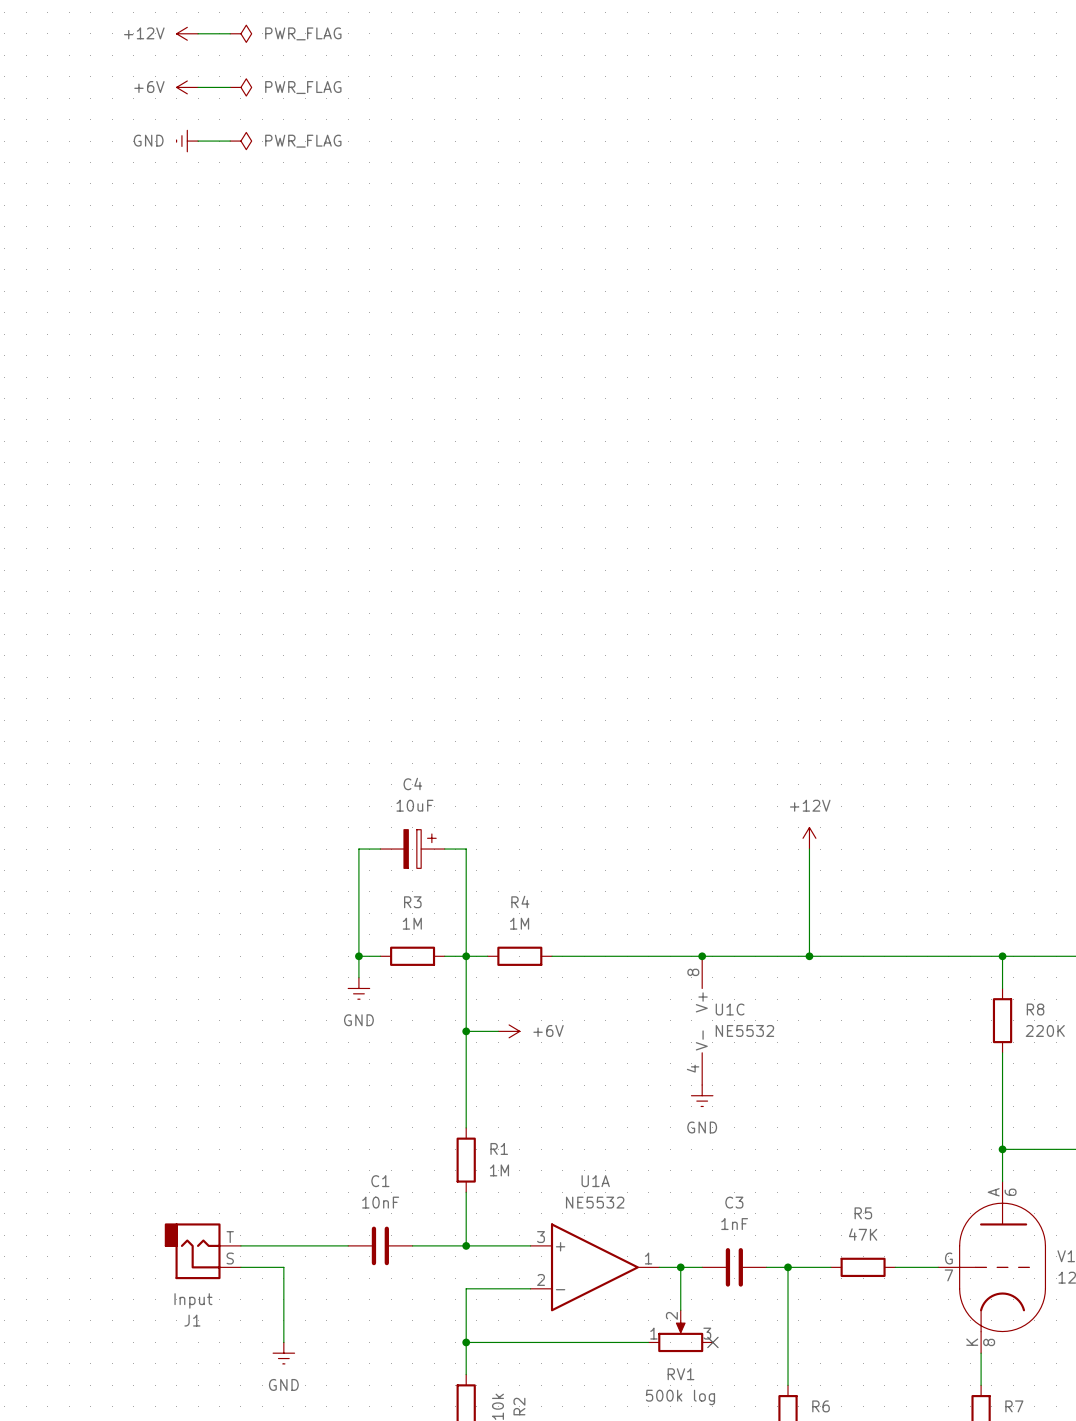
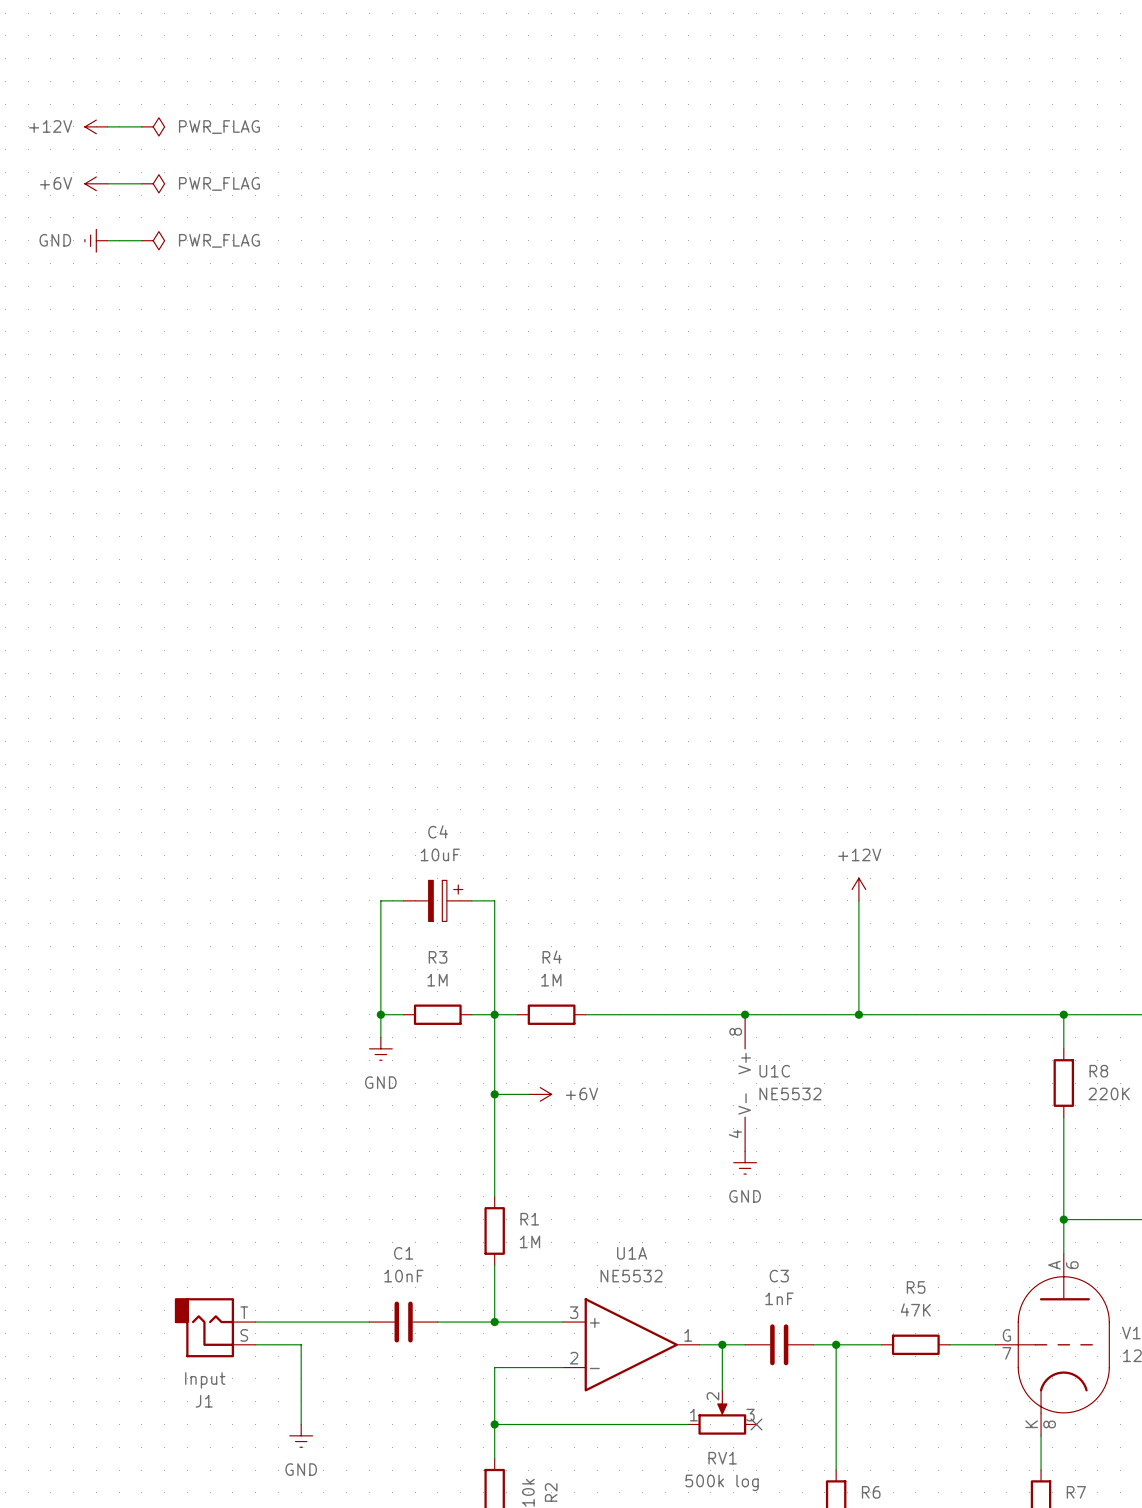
power symbol position: +12V (187, 33) -> +12V (96, 126)
wire: (198, 33) (230, 33) -> (107, 126) (141, 126)
power symbol: PWR_FLAG (240, 33) -> none
power symbol position: +6V (187, 87) -> +6V (96, 183)
wire: (198, 87) (230, 87) -> (107, 183) (141, 183)
power symbol: PWR_FLAG (240, 87) -> none
power symbol: none -> PWR_FLAG (153, 126)
power symbol position: GND (187, 141) -> GND (96, 240)
wire: (198, 141) (230, 141) -> (107, 240) (141, 240)
power symbol: PWR_FLAG (240, 141) -> none
power symbol: none -> PWR_FLAG (153, 183)
power symbol: none -> PWR_FLAG (153, 240)

